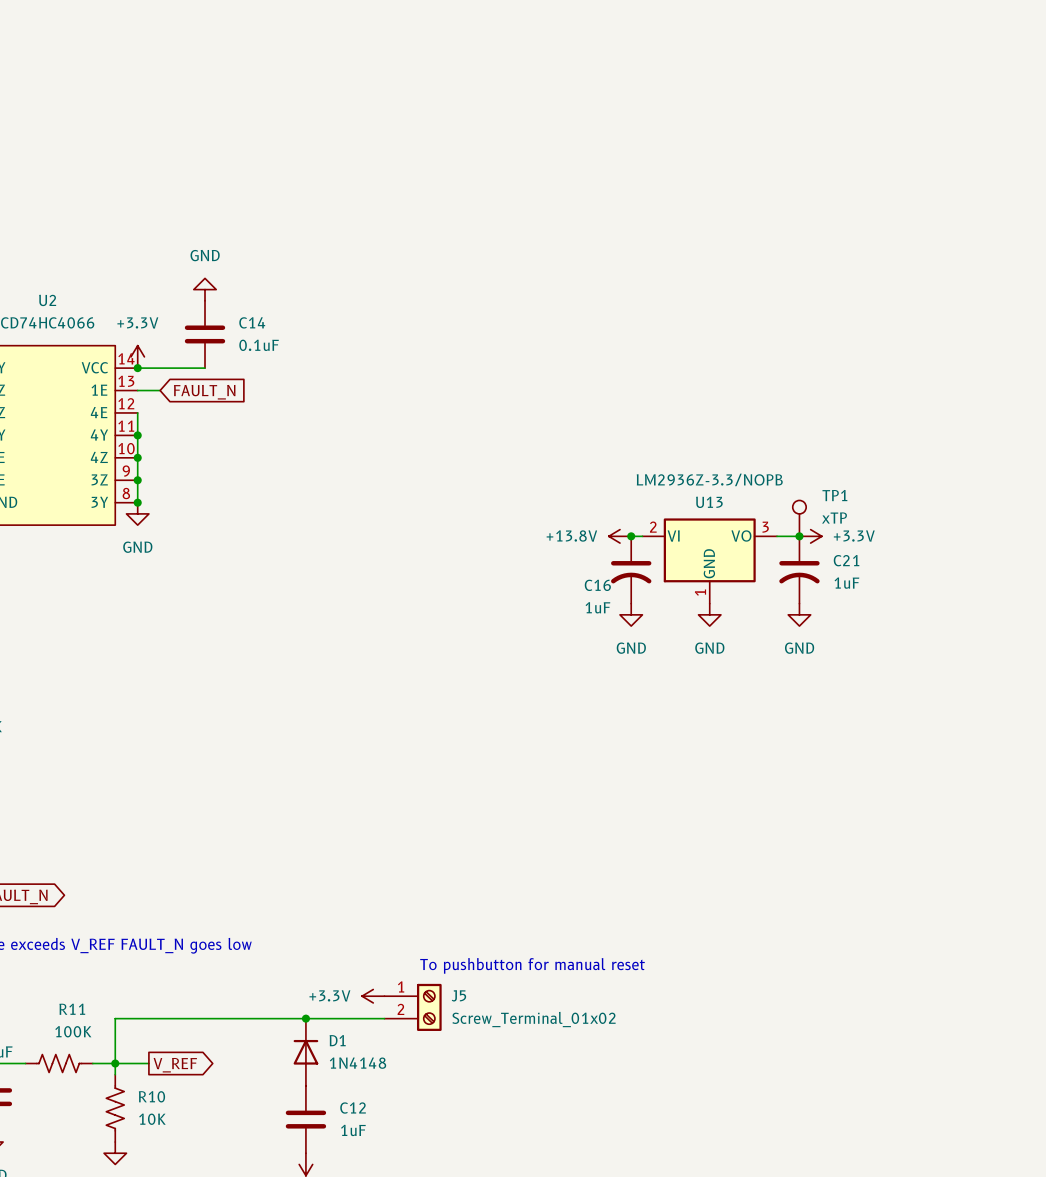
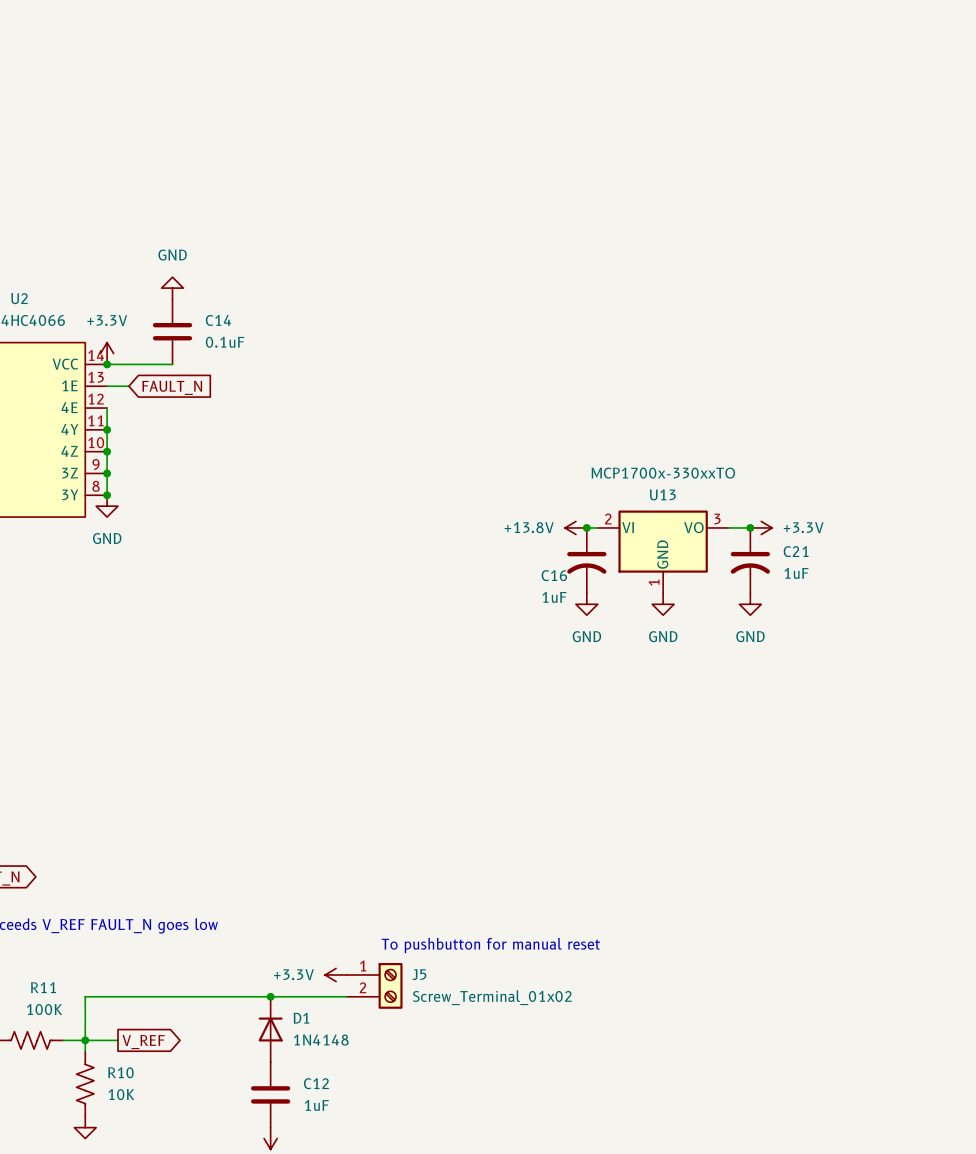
U13 value: LM2936Z-3.3/NOPB (709, 479) -> MCP1700x-330xxTO (663, 473)
TP1: xTP (799, 518) -> none

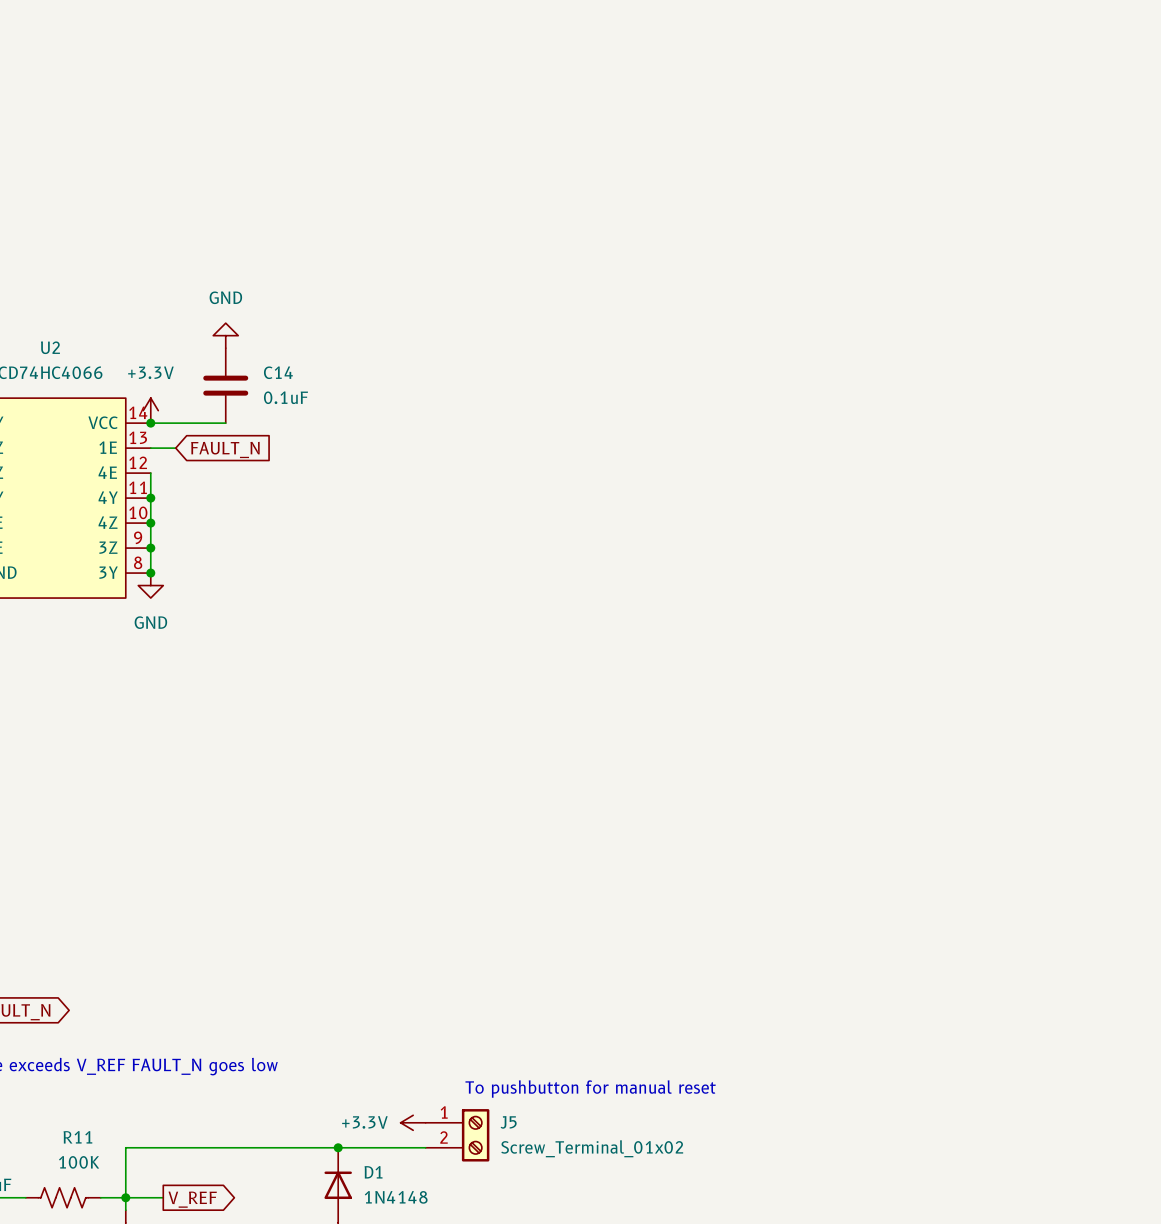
power symbol: +13.8V (575, 527) -> none
wire: (586, 527) (597, 527) -> none
junction: (586, 527) -> none
wire: (728, 527) (750, 527) -> none
junction: (750, 527) -> none
power symbol: +3.3V (761, 527) -> none
U13: MCP1700x-330xxTO (663, 551) -> none
C16: 1uF (586, 560) -> none
C21: 1uF (750, 560) -> none
power symbol: GND (586, 604) -> none
power symbol: GND (663, 604) -> none
power symbol: GND (750, 604) -> none

